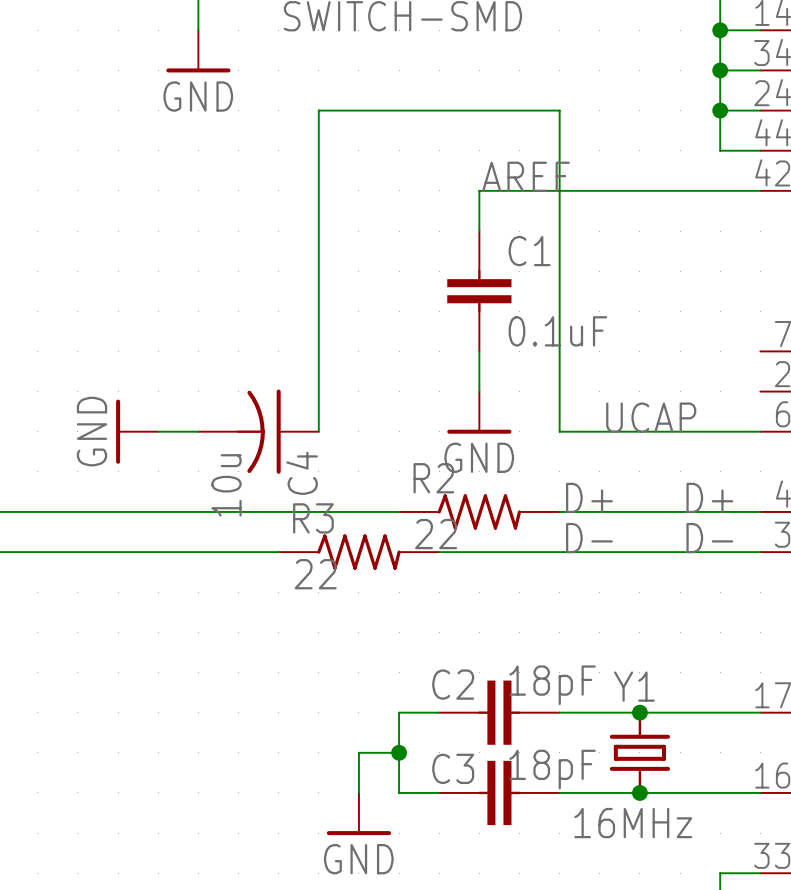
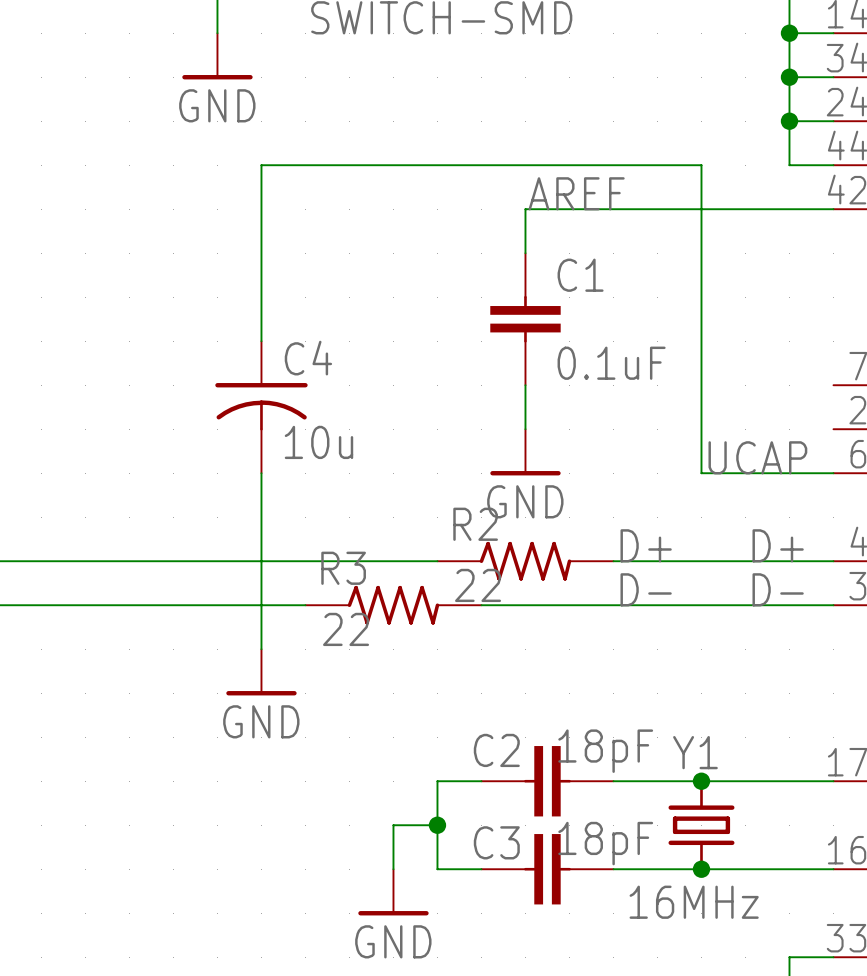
label position: UCAP (651, 417) -> UCAP (757, 457)
power symbol rotation: 0° (118, 431) -> 90° counterclockwise (261, 693)
power symbol position: GND (137, 431) -> GND (261, 672)
wire: (158, 431) (198, 431) -> none
wire: none -> (261, 473) (261, 649)
C4 rotation: 0° (258, 431) -> 90° counterclockwise (261, 406)
wire: (318, 431) (318, 110) (559, 110) (559, 431) (639, 431) -> (261, 341) (261, 165) (701, 165) (701, 473)

